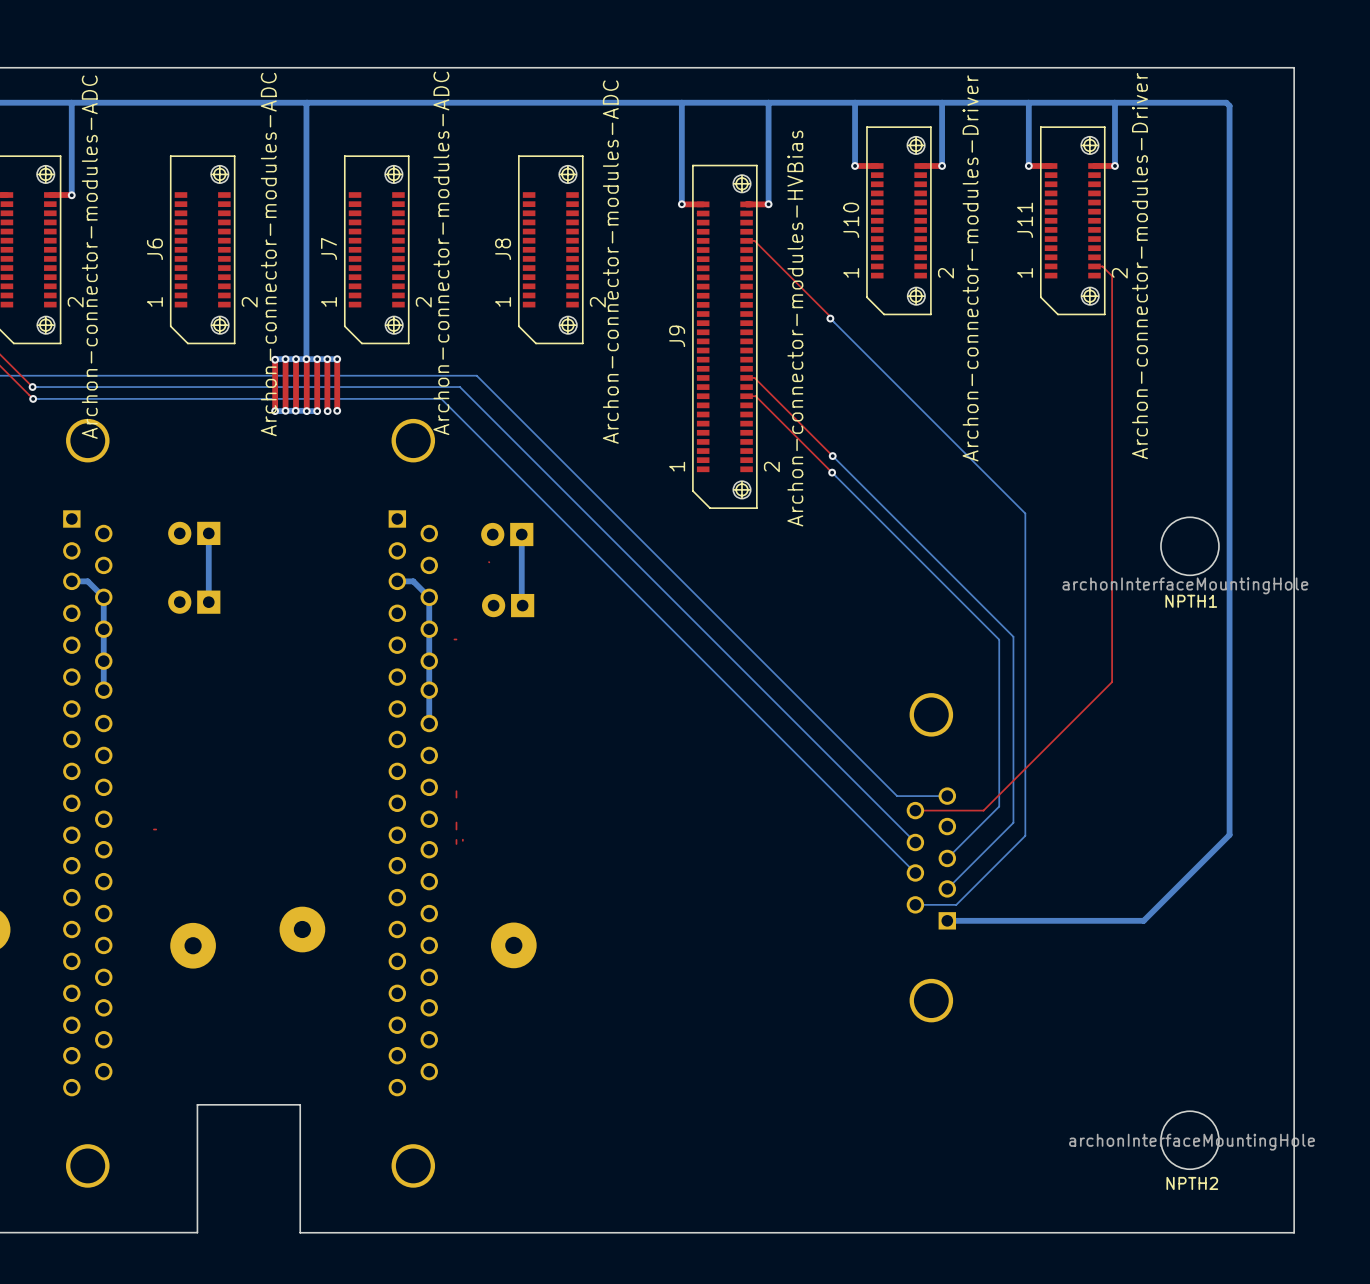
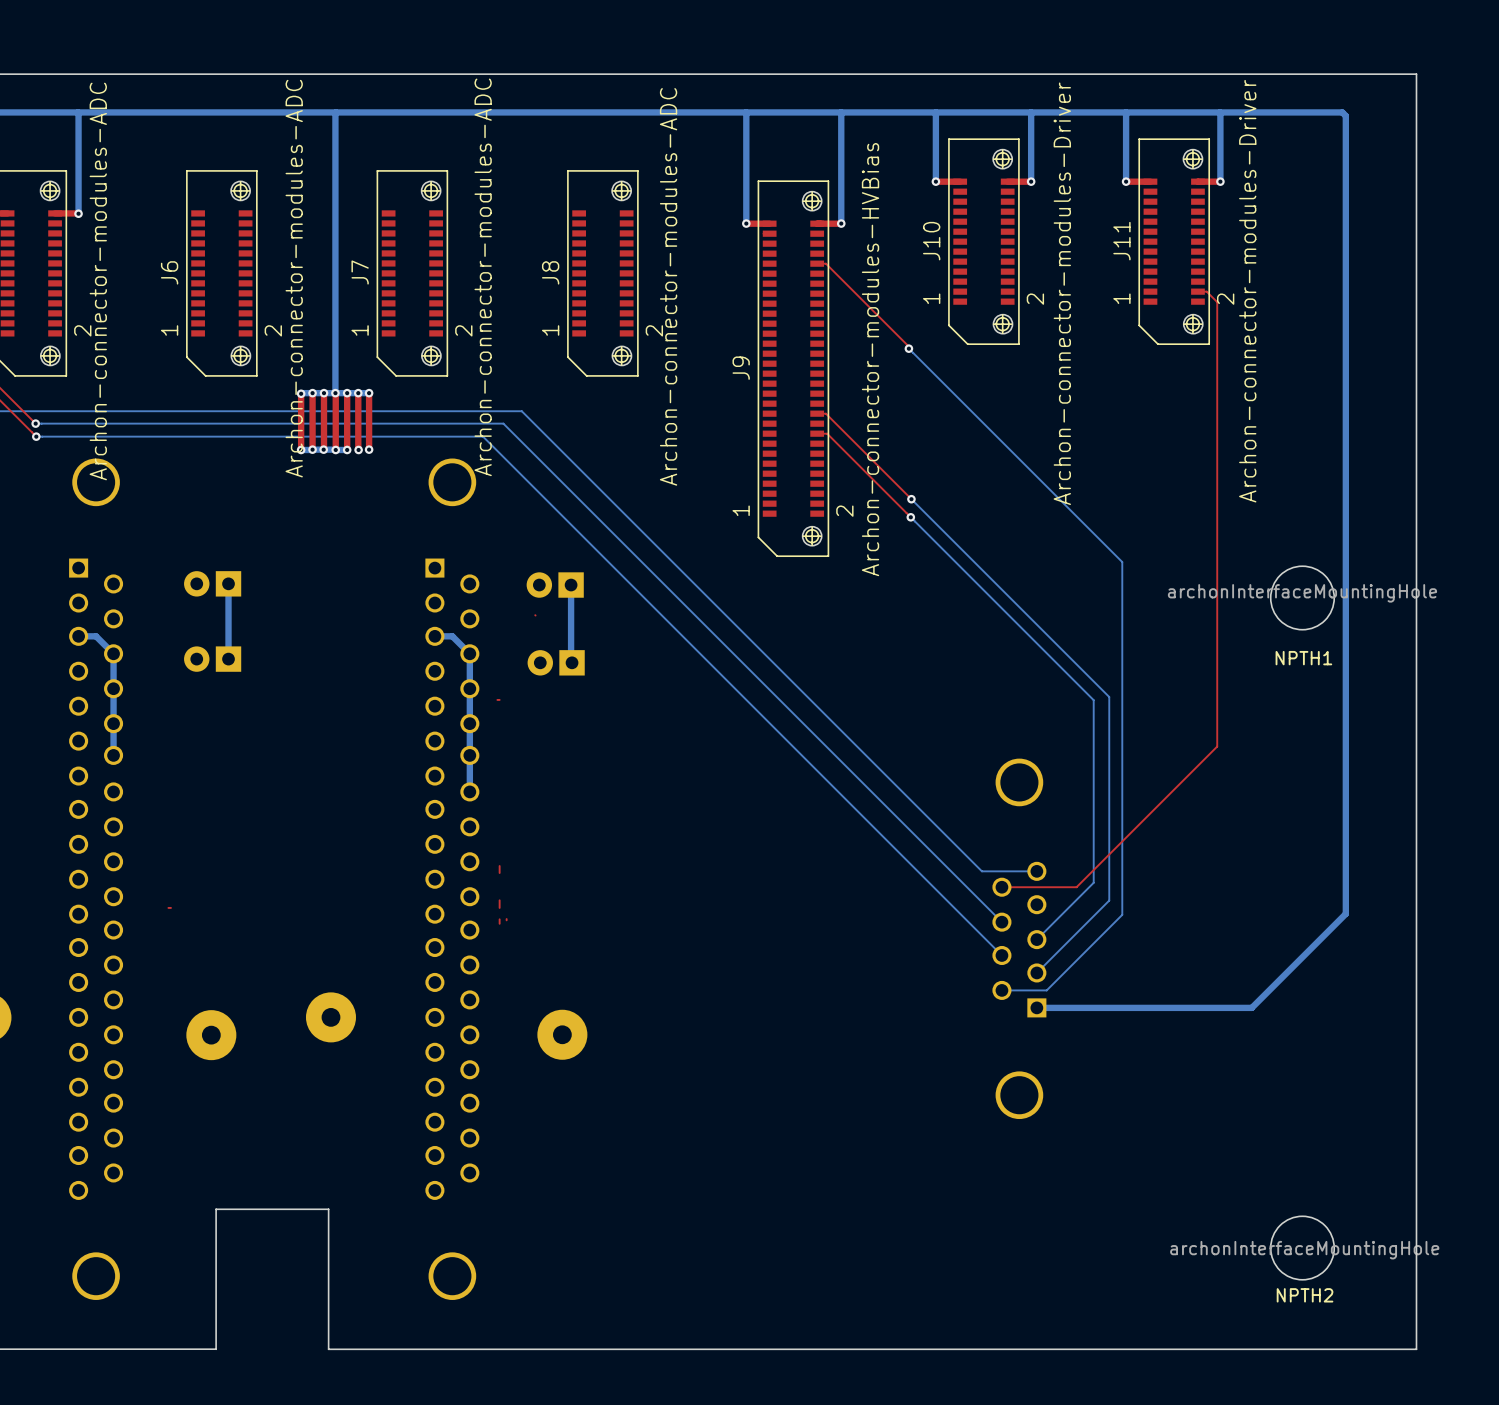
NPTH1 value position: archonInterfaceMountingHole (1185, 585) -> archonInterfaceMountingHole (1302, 593)

